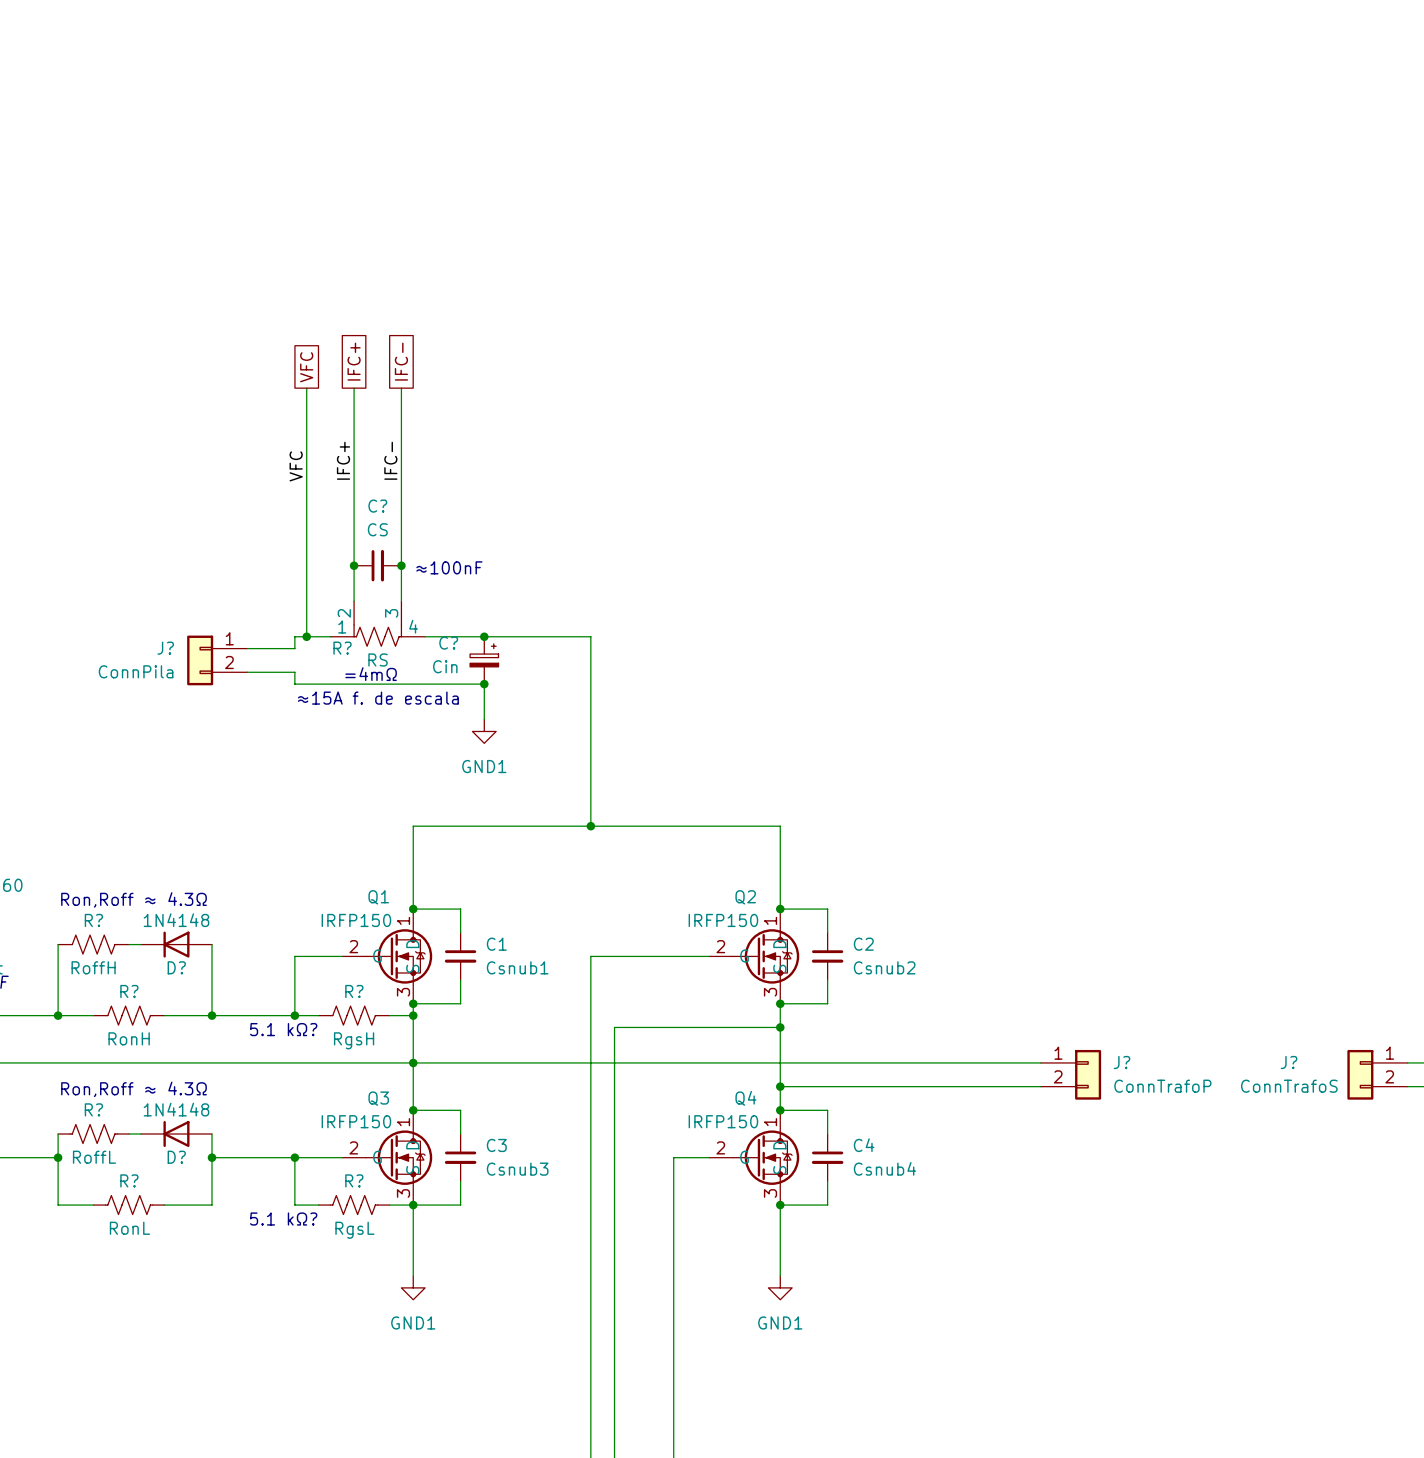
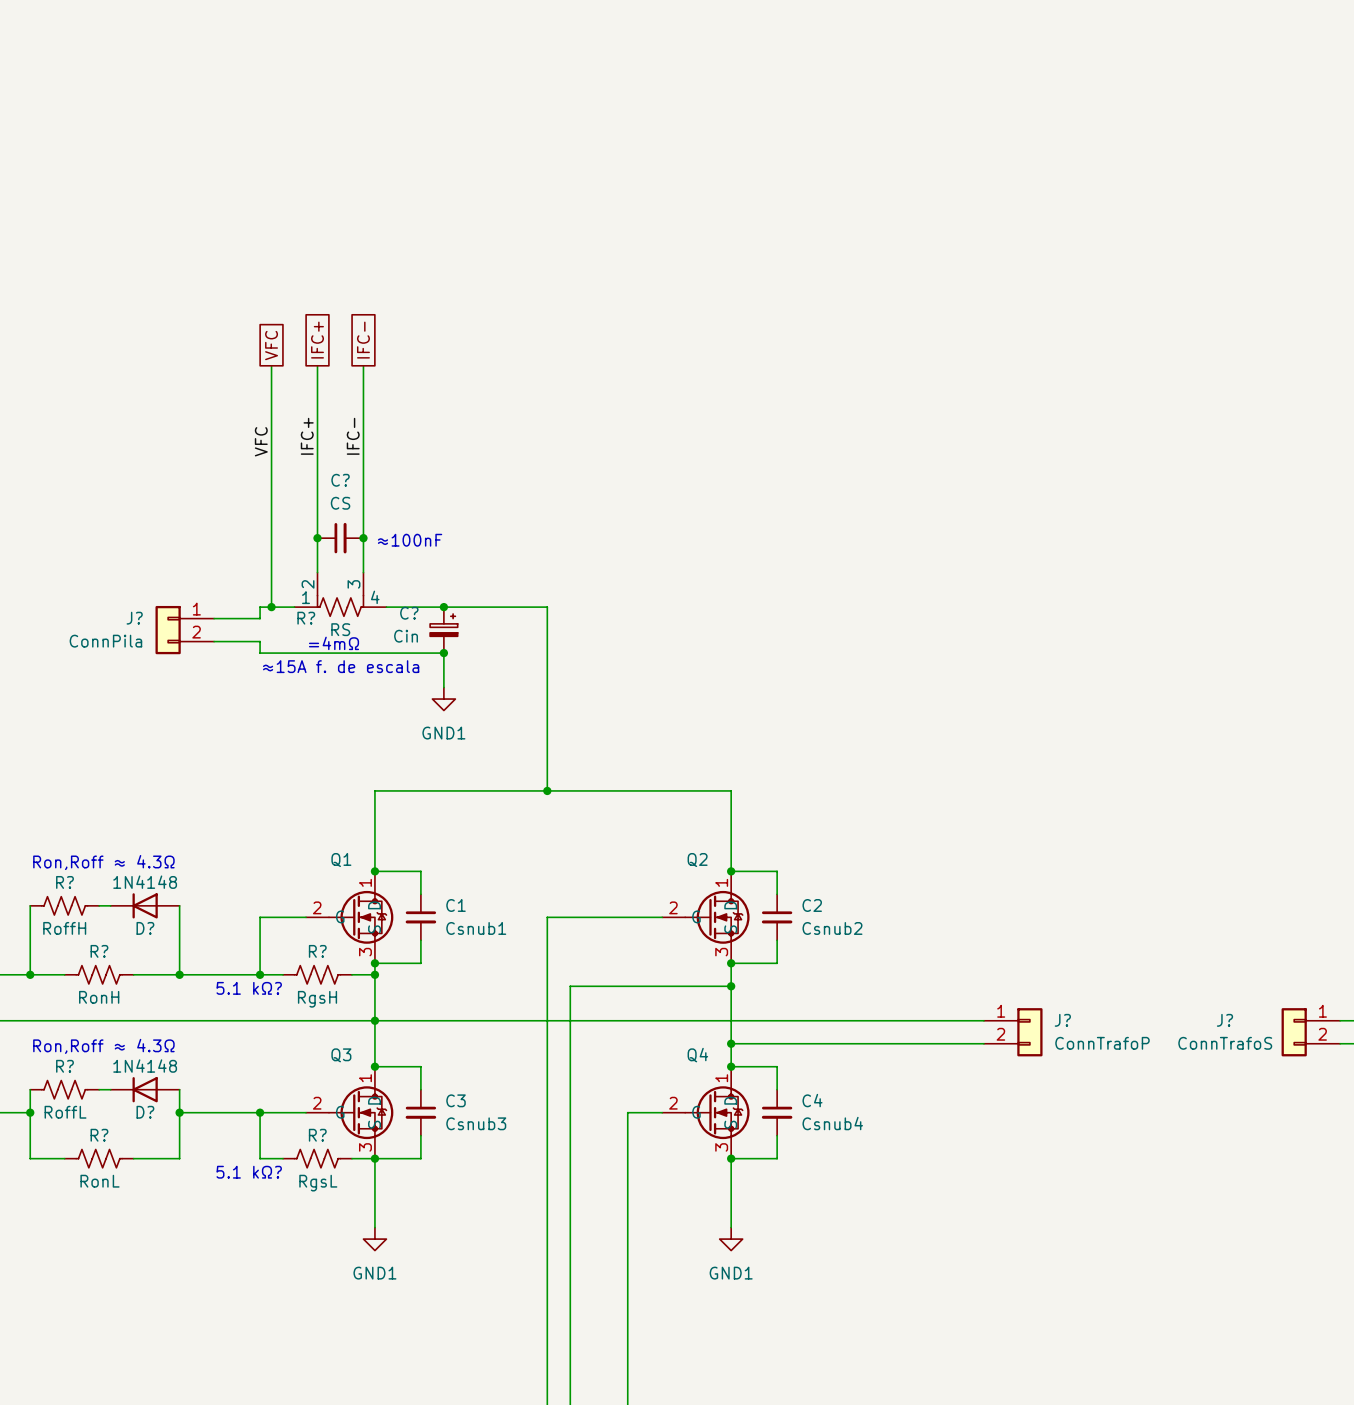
Q1 value: IRFP150 (356, 920) -> none
Q2 value: IRFP150 (723, 920) -> none
Q3 value: IRFP150 (356, 1121) -> none
Q4 value: IRFP150 (723, 1121) -> none

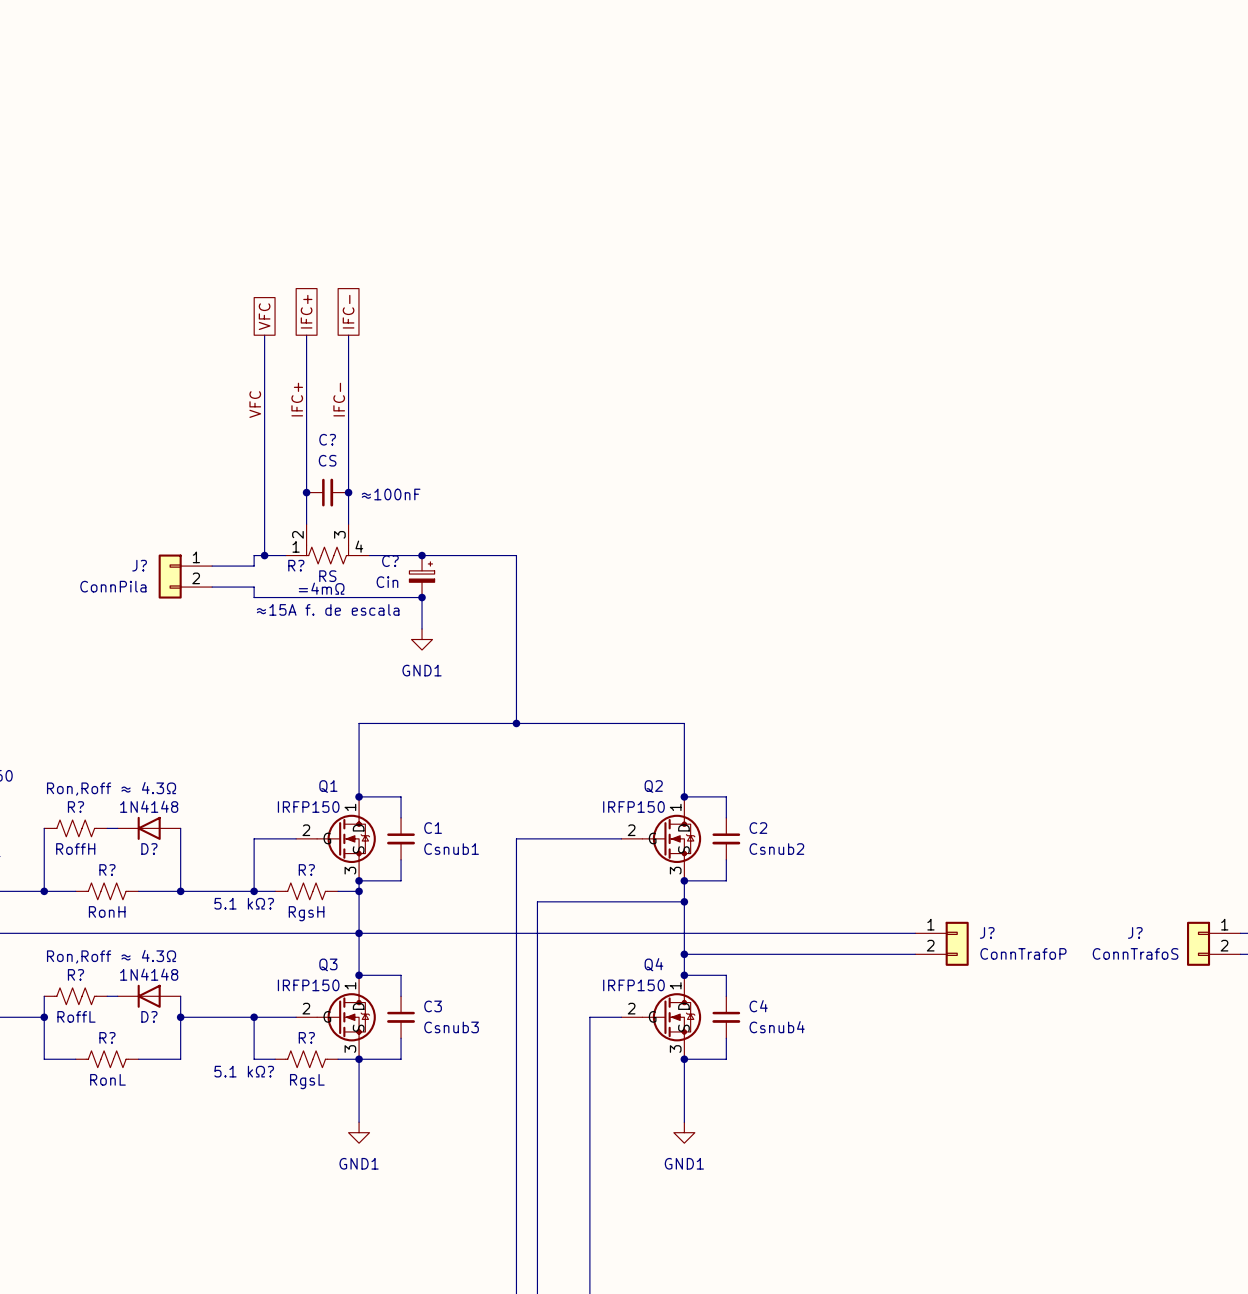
Q1 value: none -> IRFP150 (308, 807)
Q2 value: none -> IRFP150 (633, 807)
Q3 value: none -> IRFP150 (308, 985)
Q4 value: none -> IRFP150 (633, 985)

